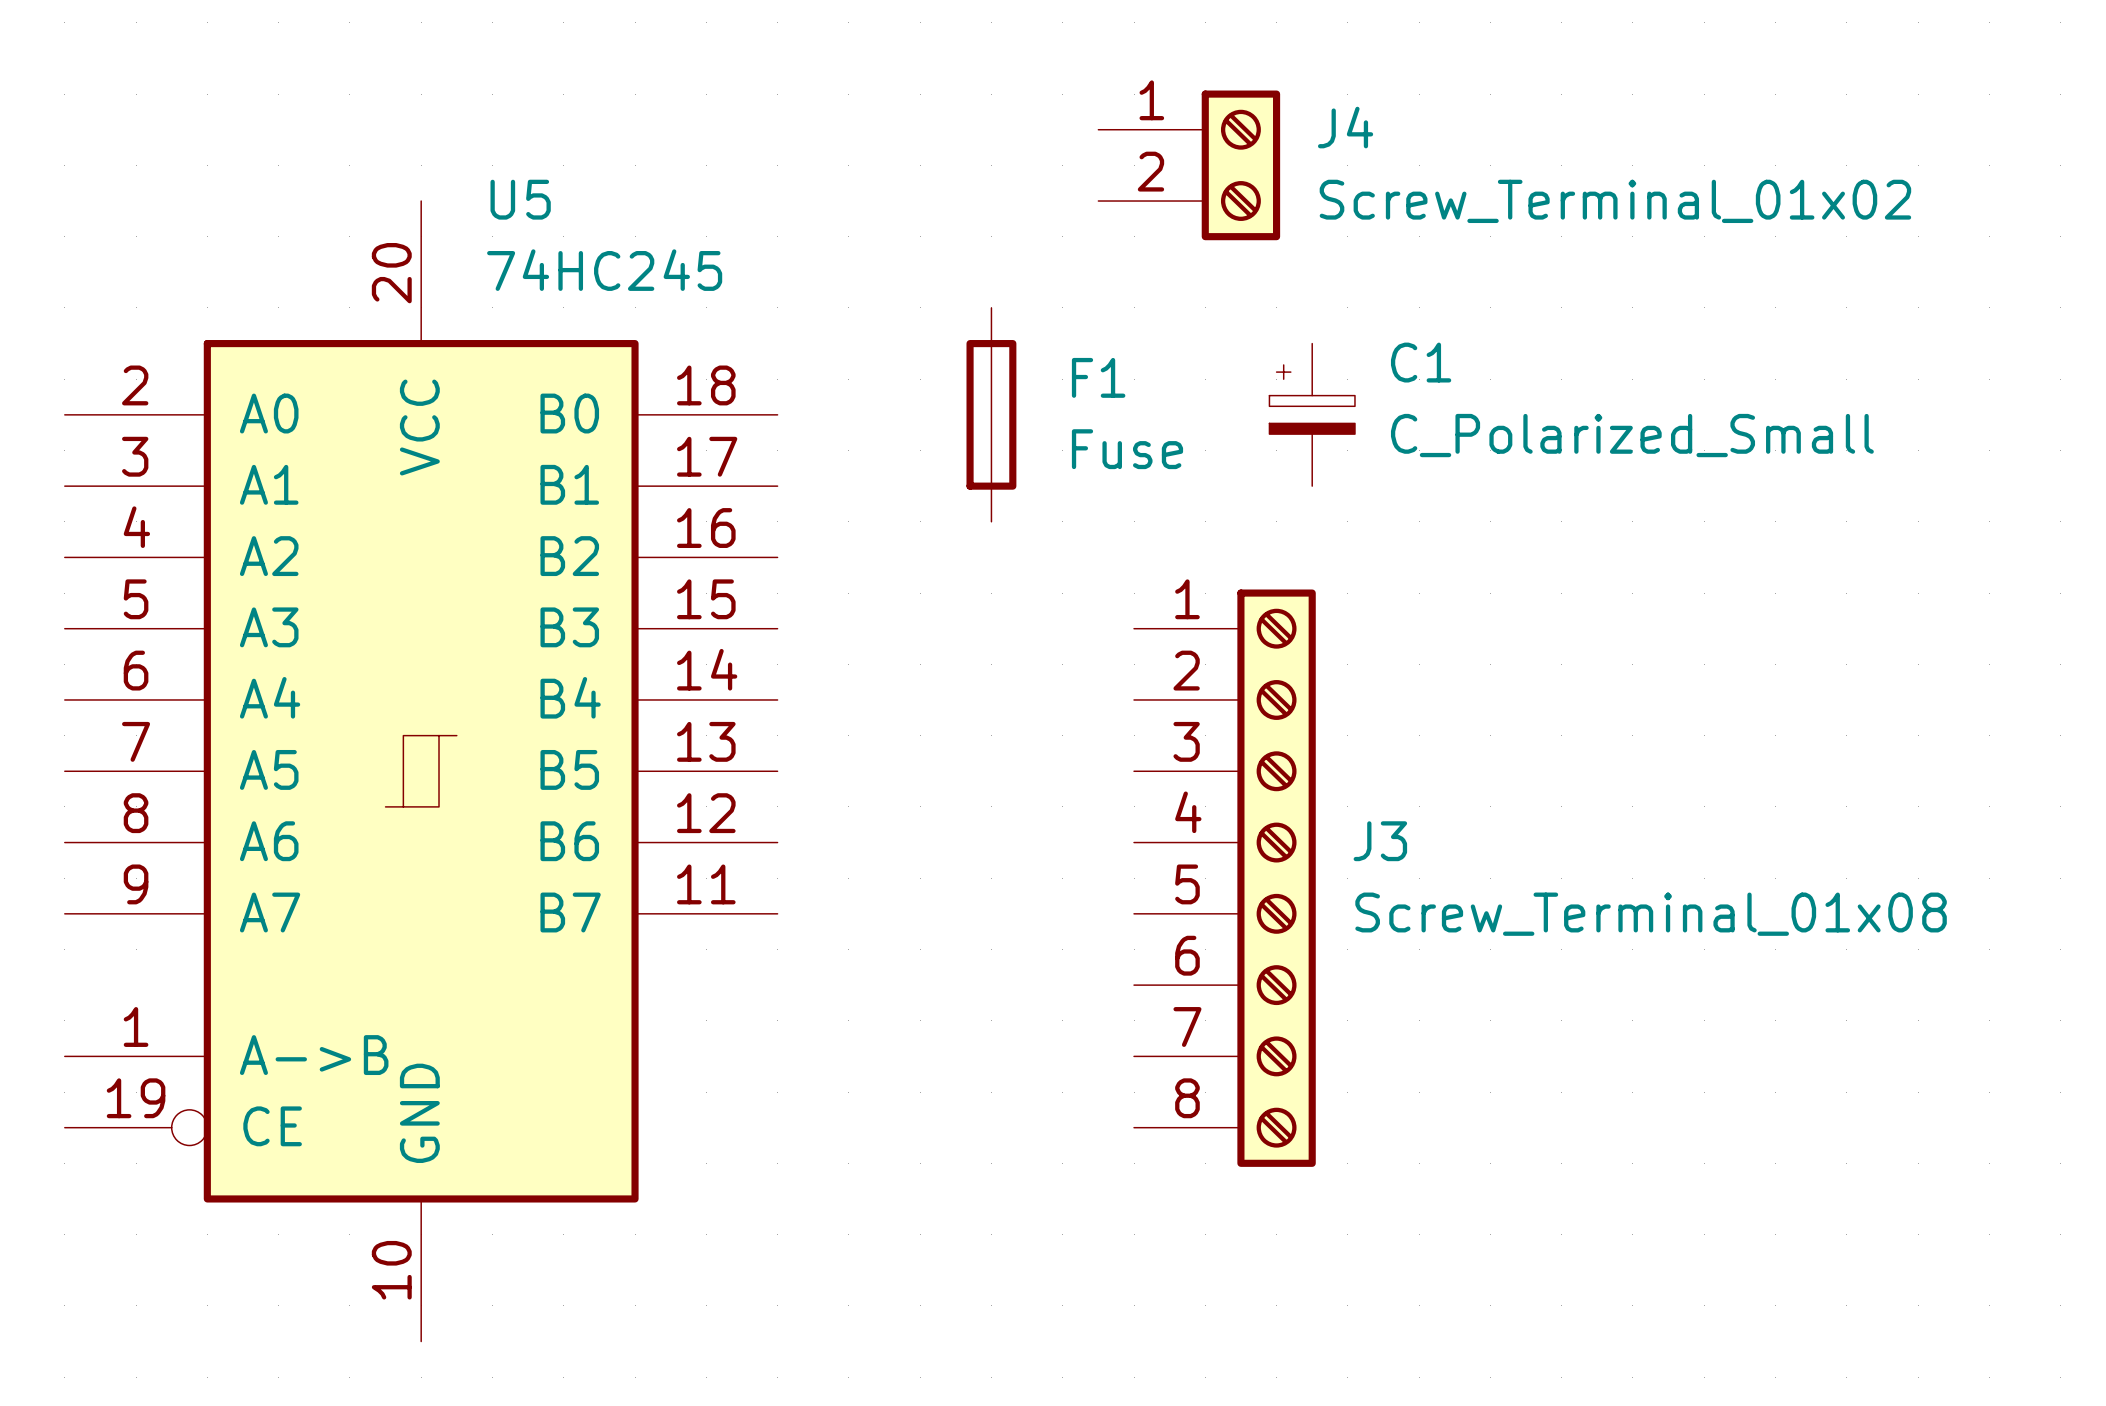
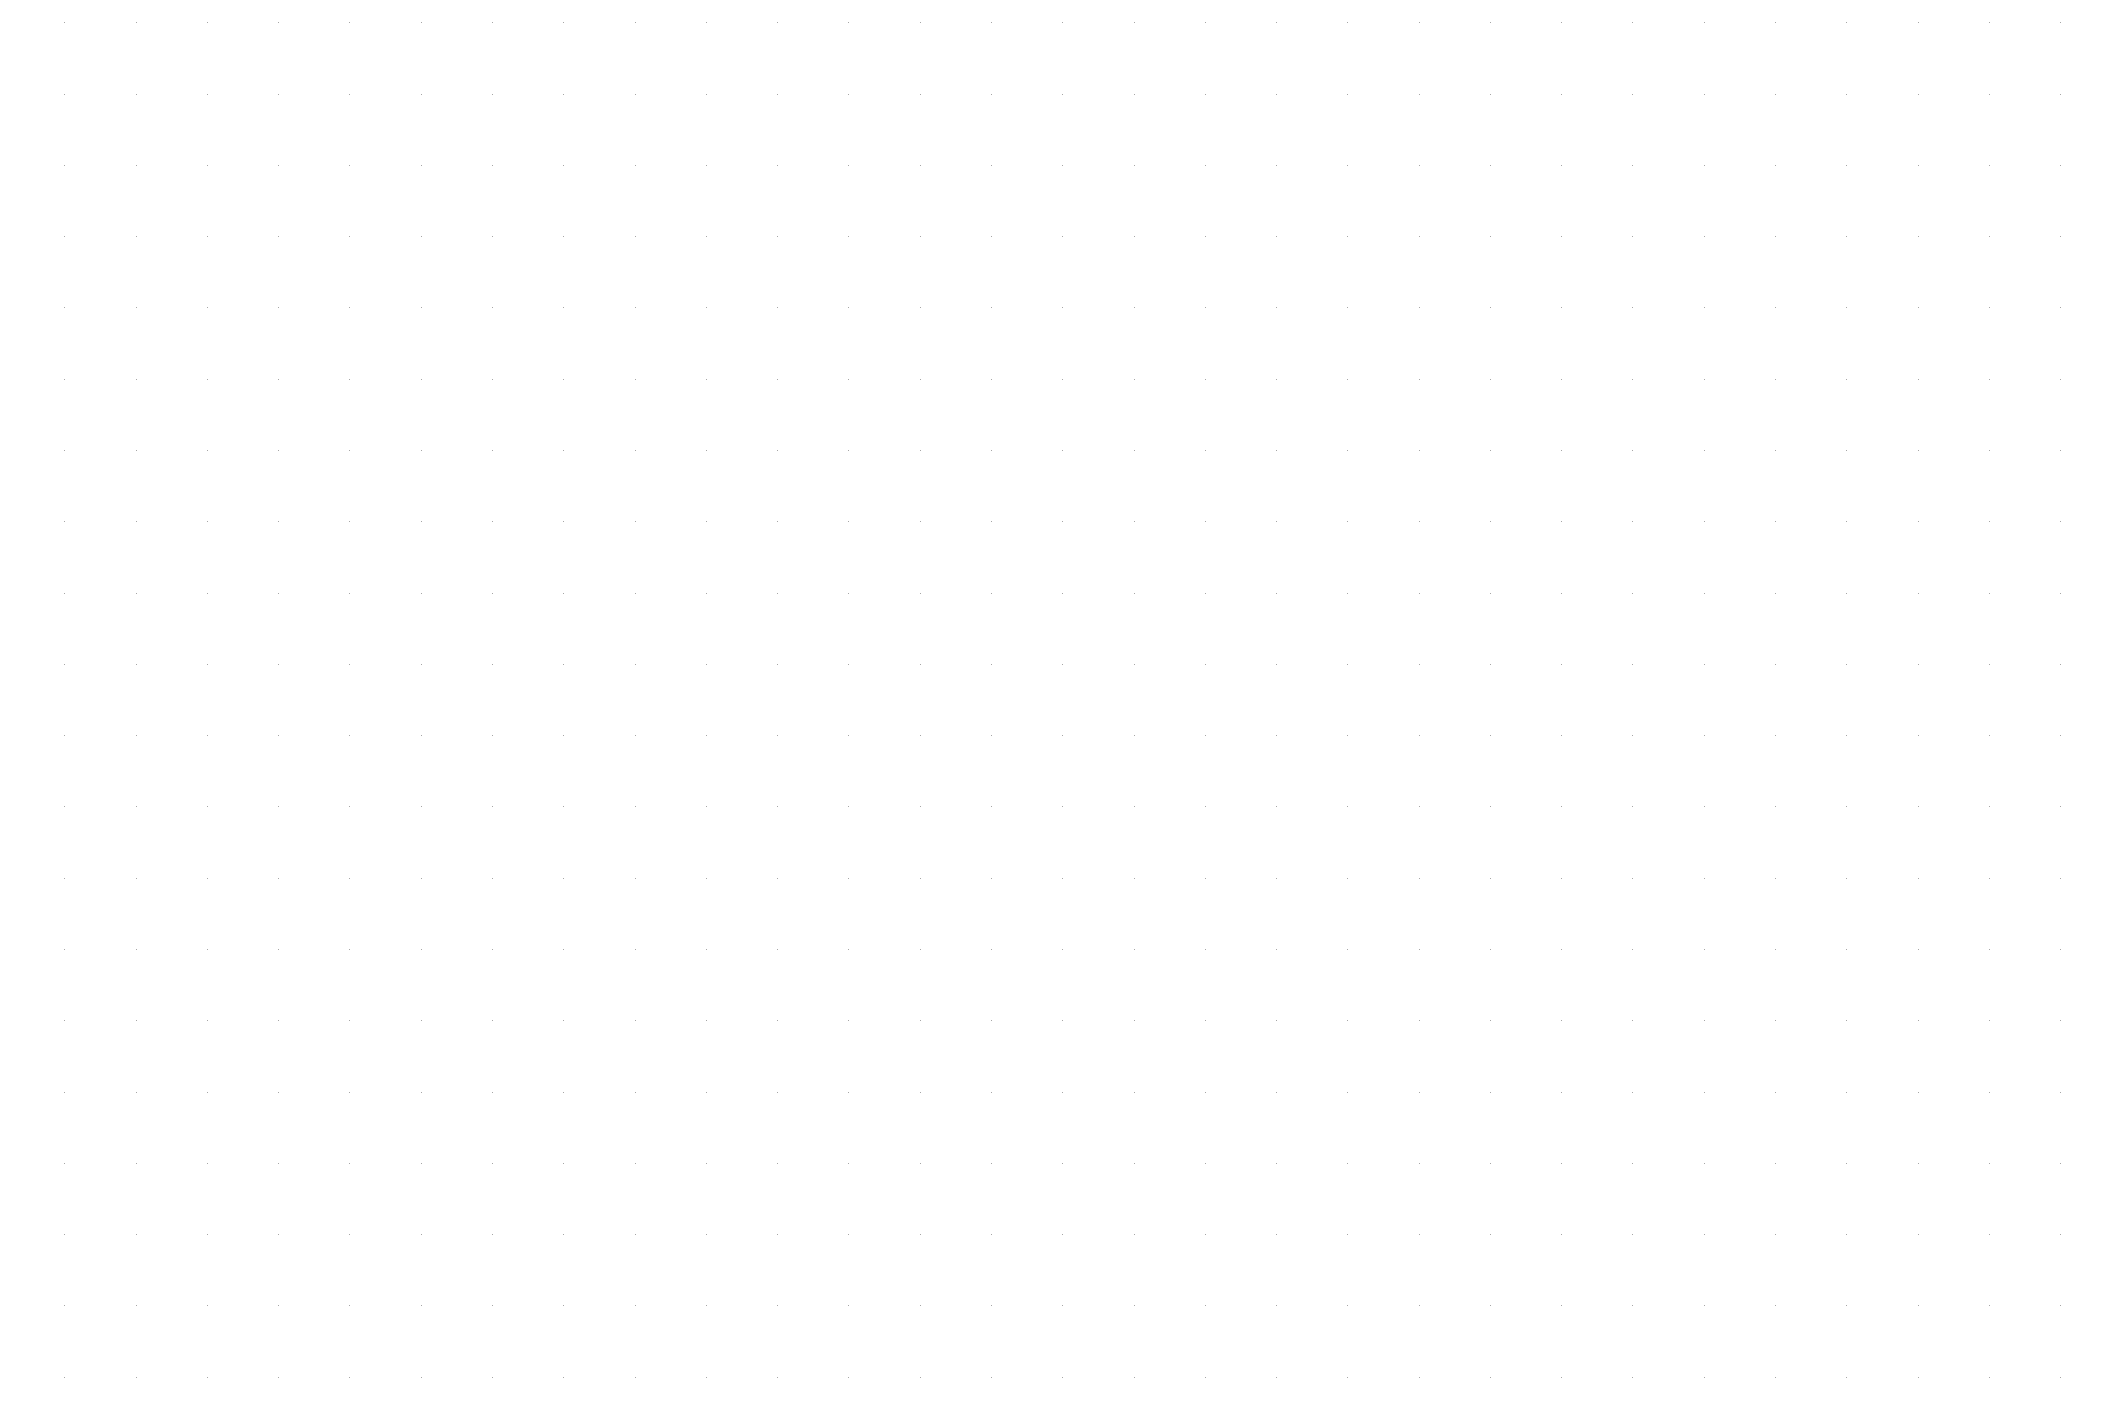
J4: Screw_Terminal_01x02 (1189, 165) -> none
F1: Fuse (991, 414) -> none
C1: C_Polarized_Small (1312, 414) -> none
U5: 74HC245 (421, 771) -> none
J3: Screw_Terminal_01x08 (1224, 878) -> none

